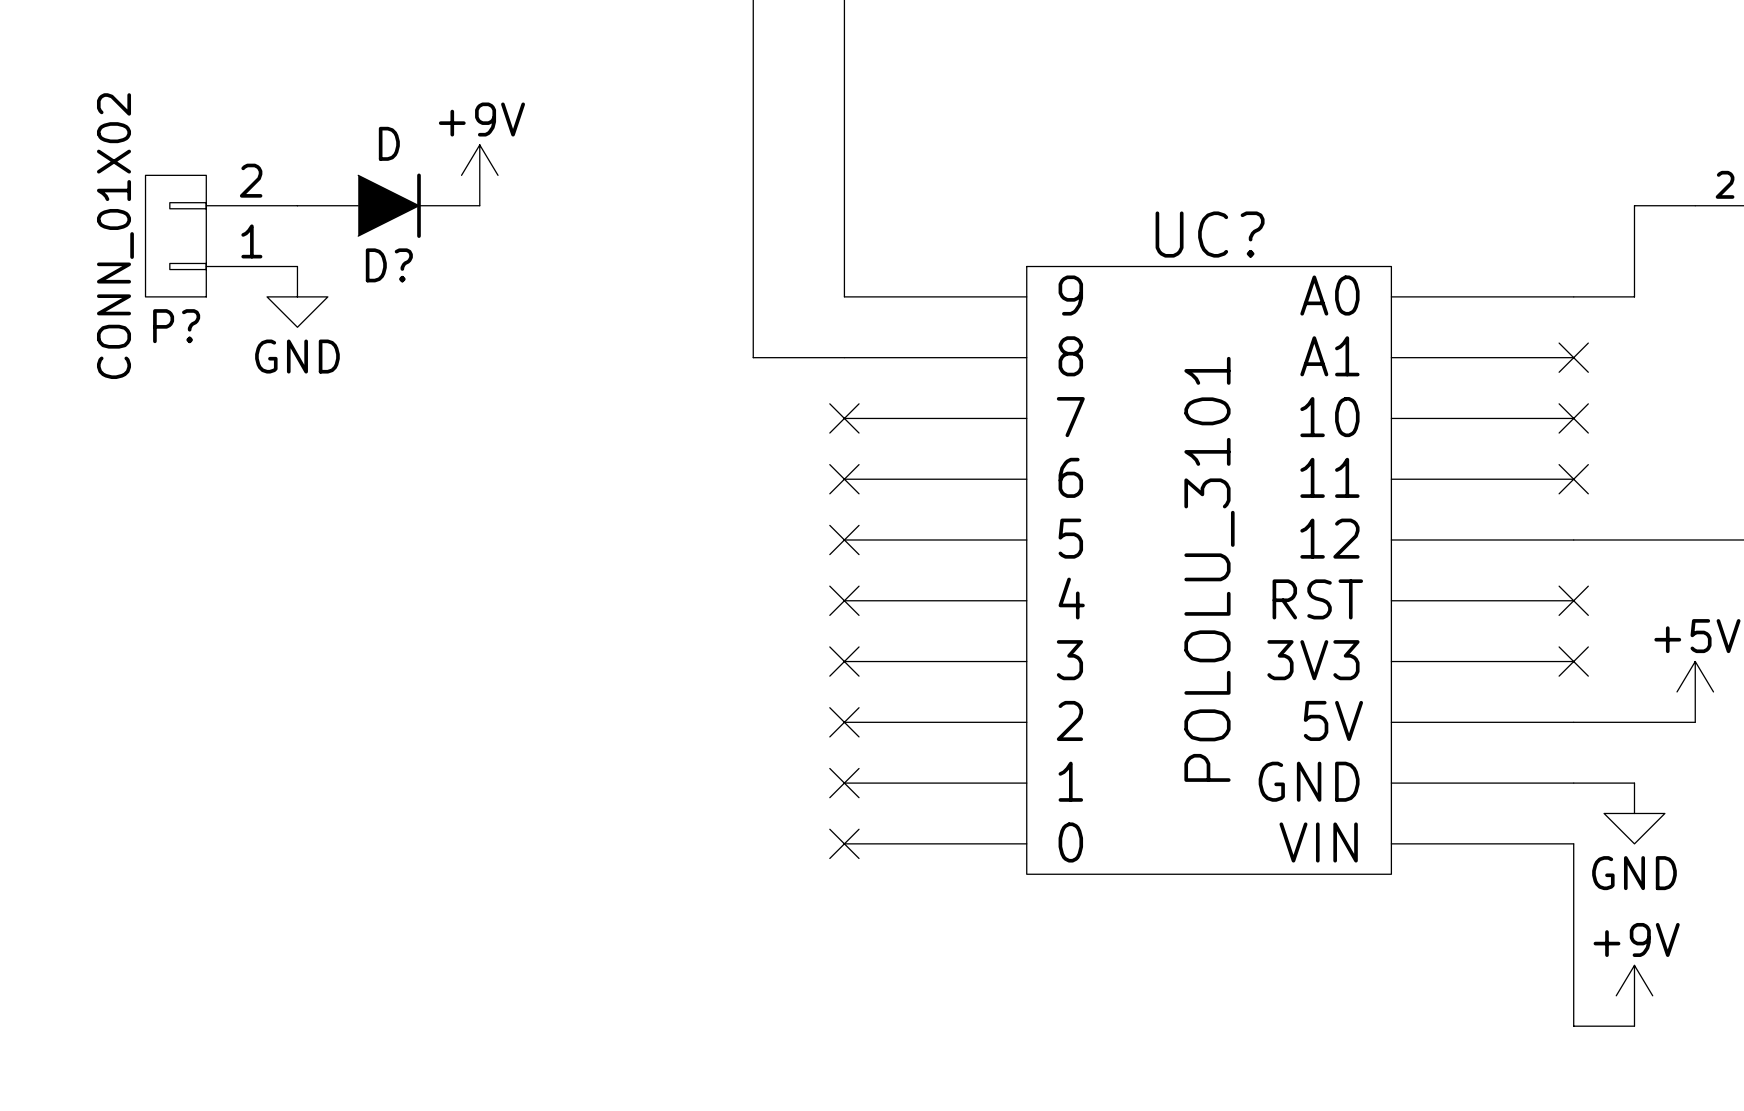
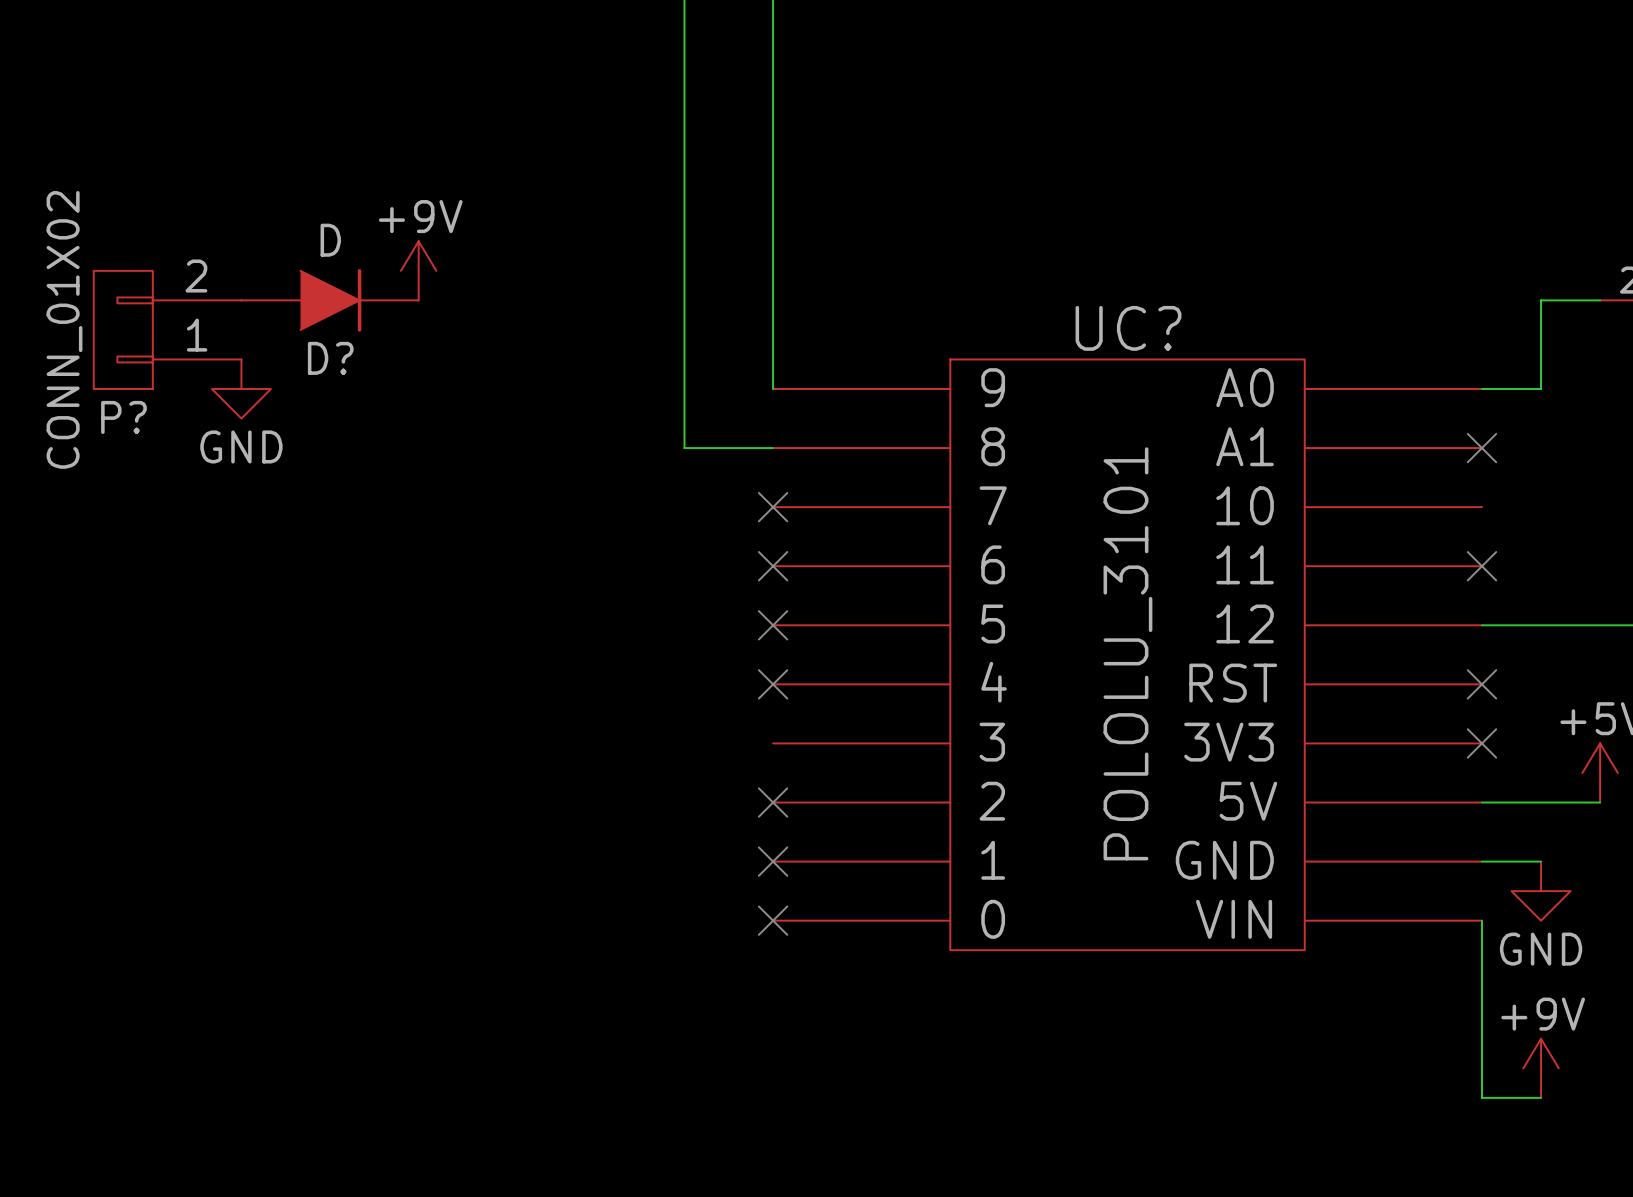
no-connect mark: (1573, 418) -> none
no-connect mark: (844, 661) -> none

